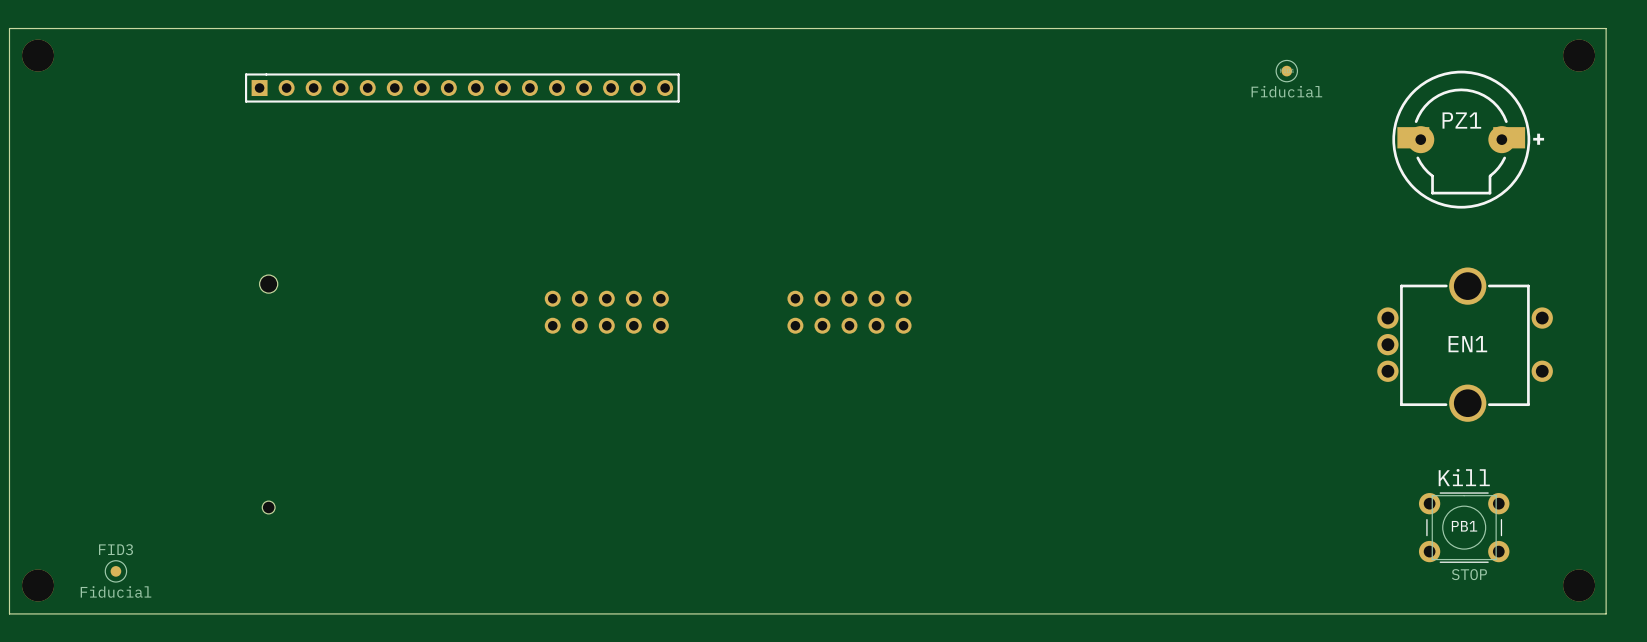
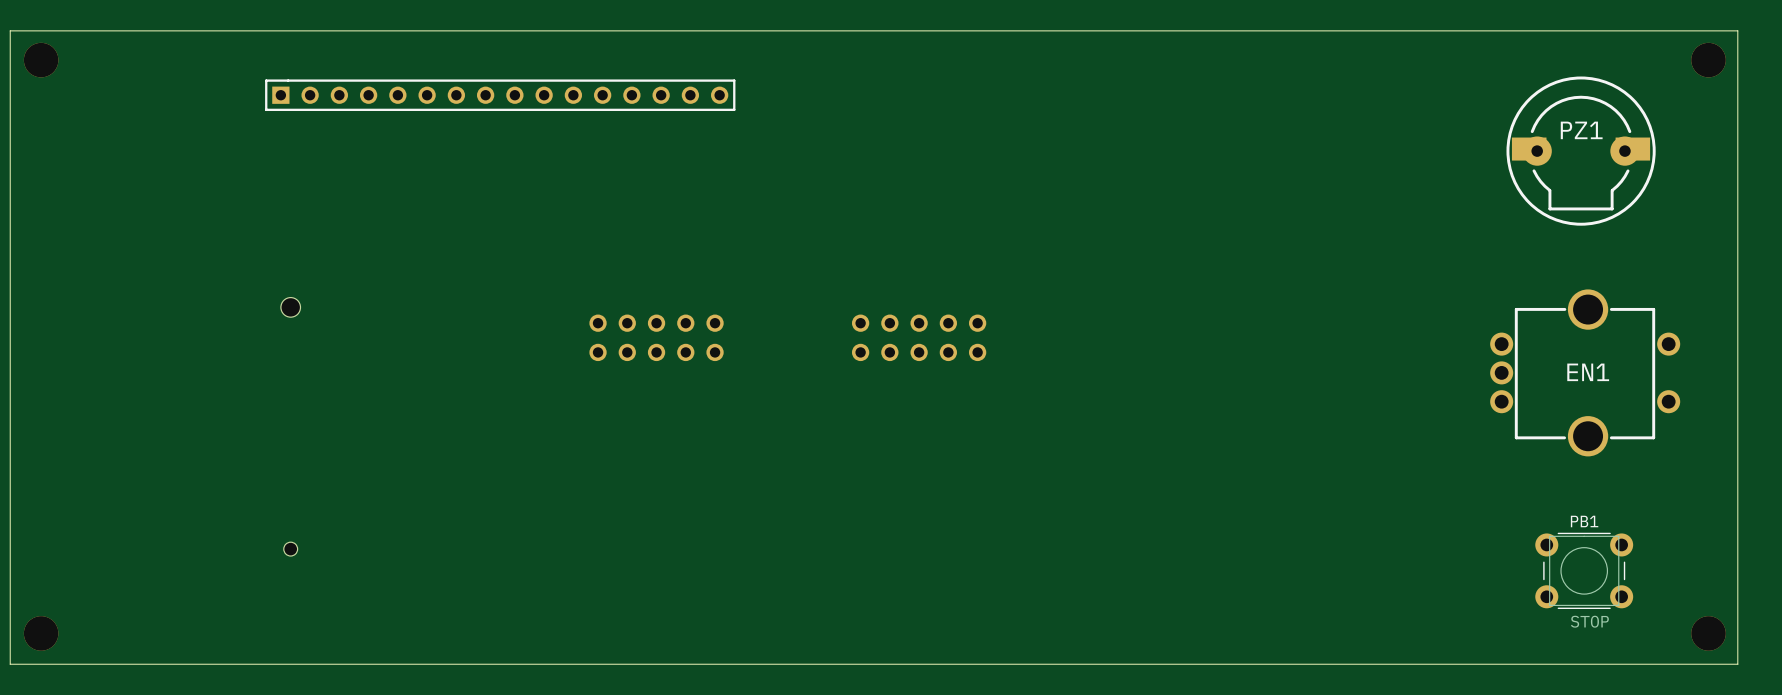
part: Fiducial (1286, 71) -> none
PZ1 text: + (1538, 139) -> none
text: Kill (1464, 477) -> none
PB1 name position: PB1 (1464, 526) -> PB1 (1584, 521)
FID3: Fiducial (115, 571) -> none

